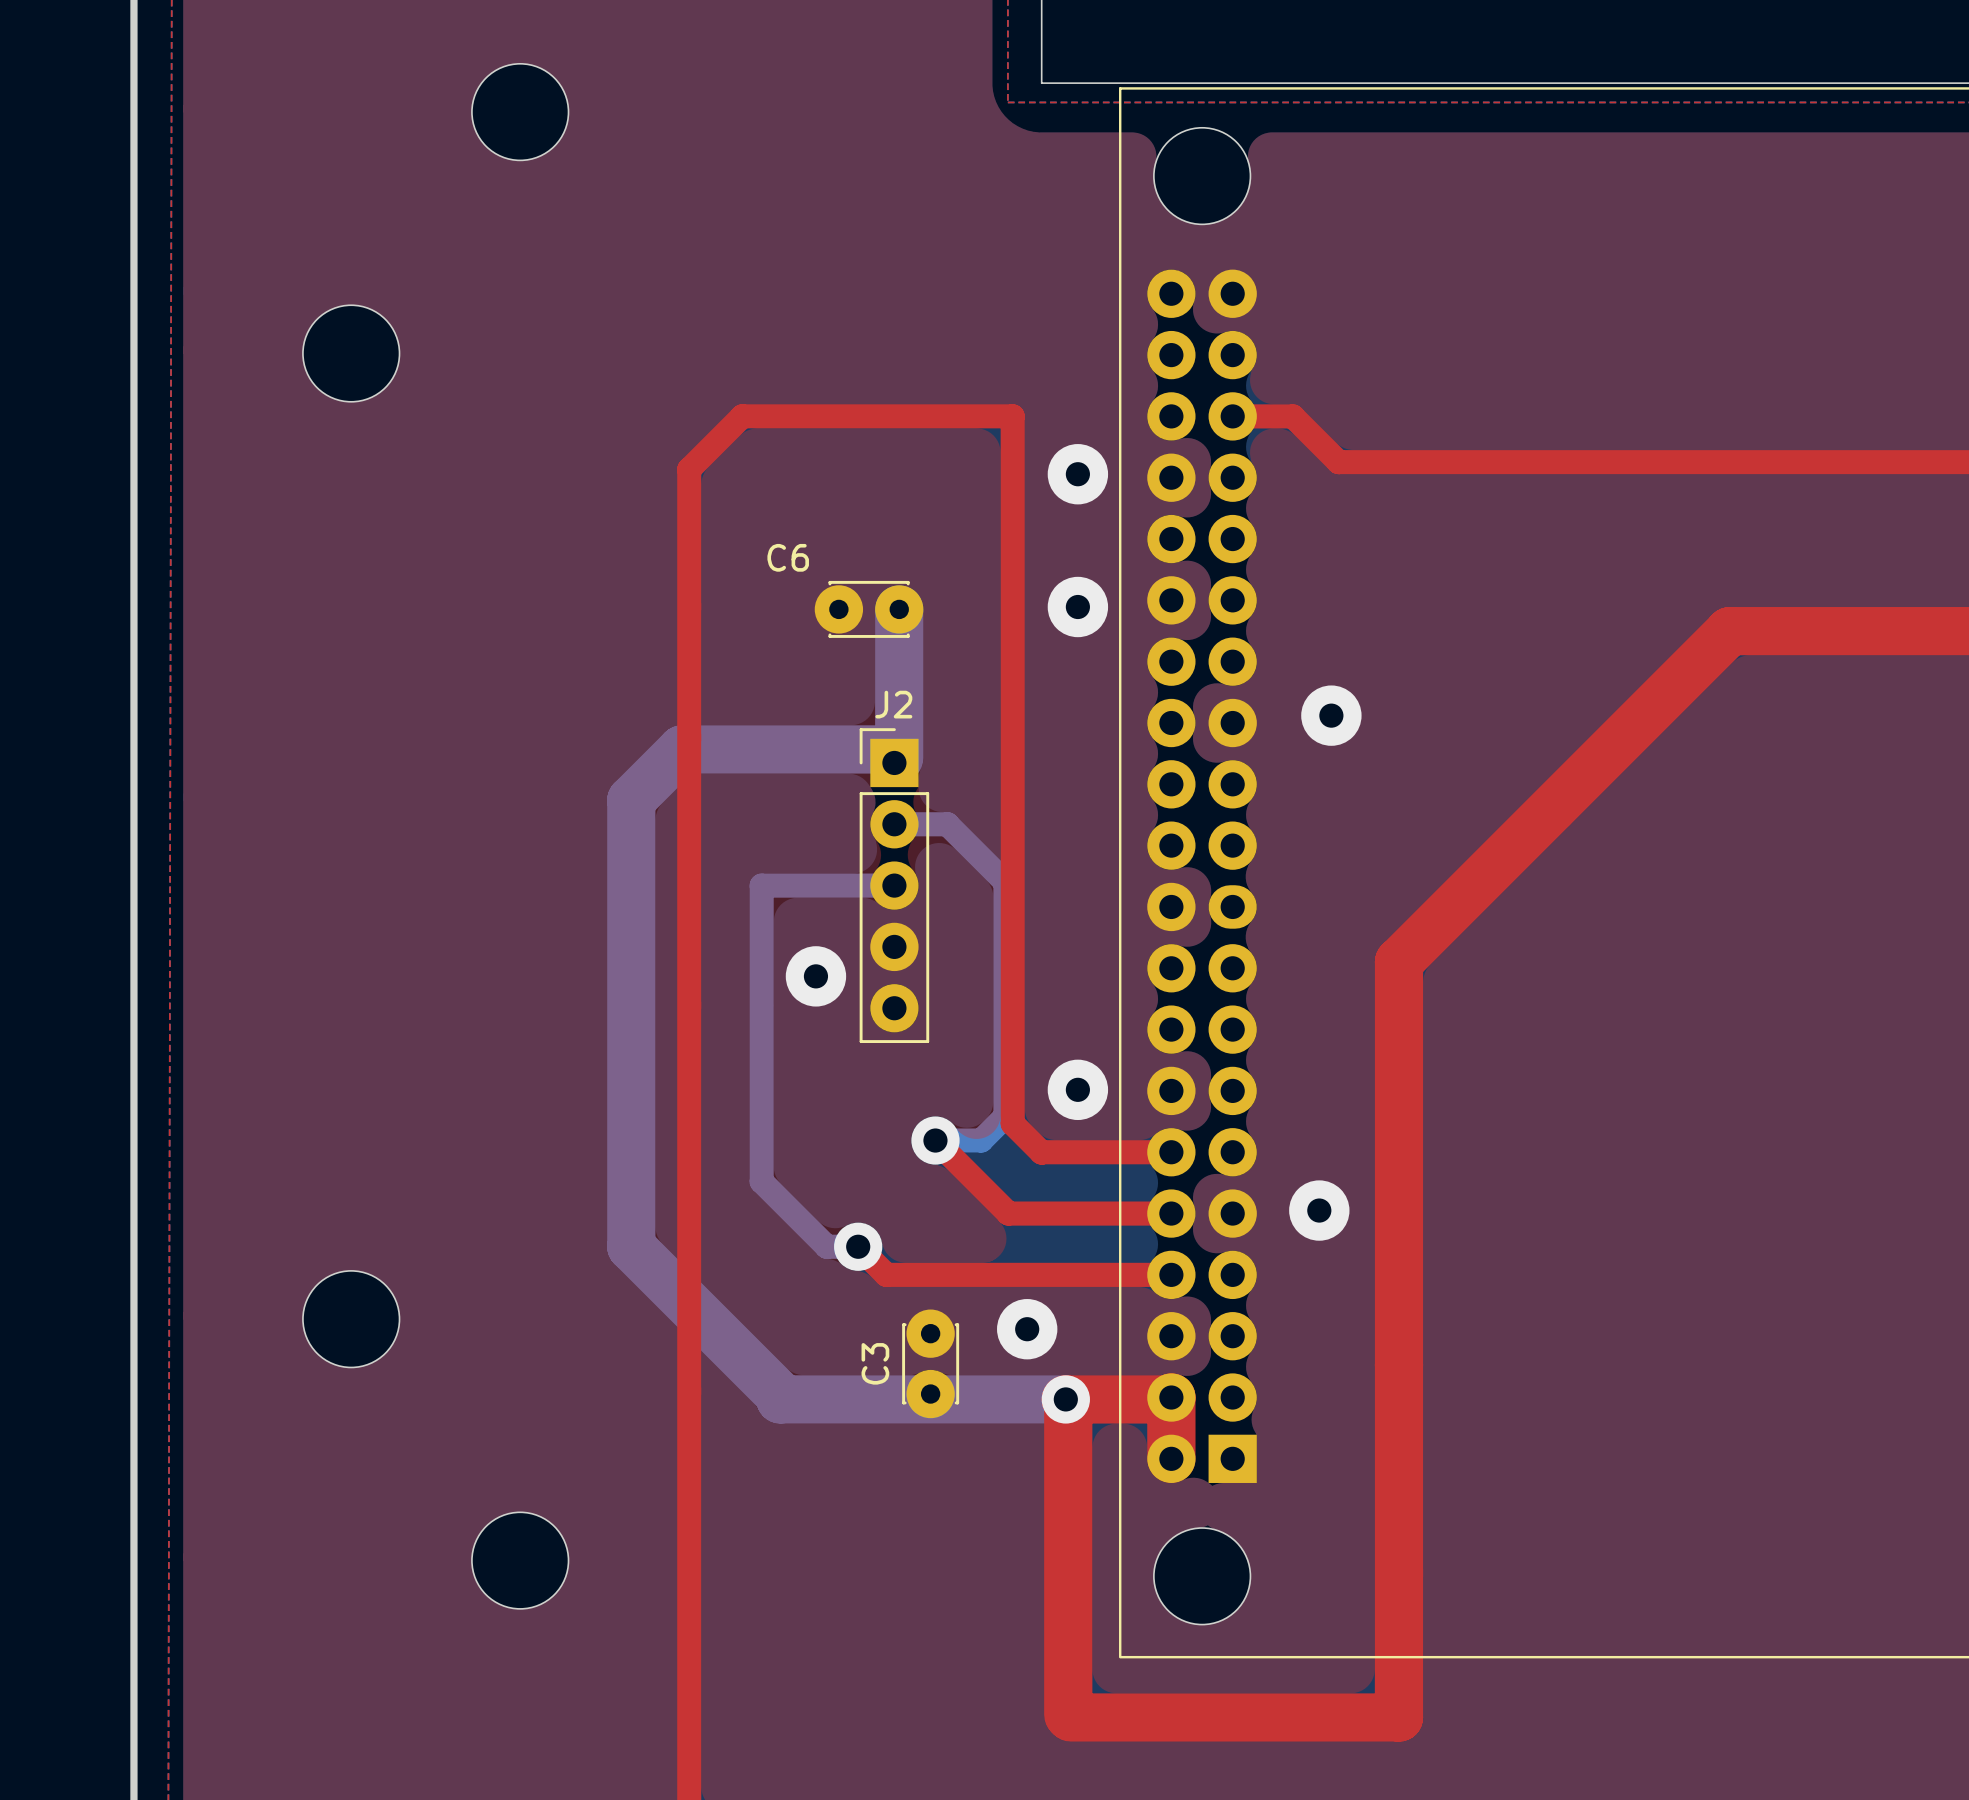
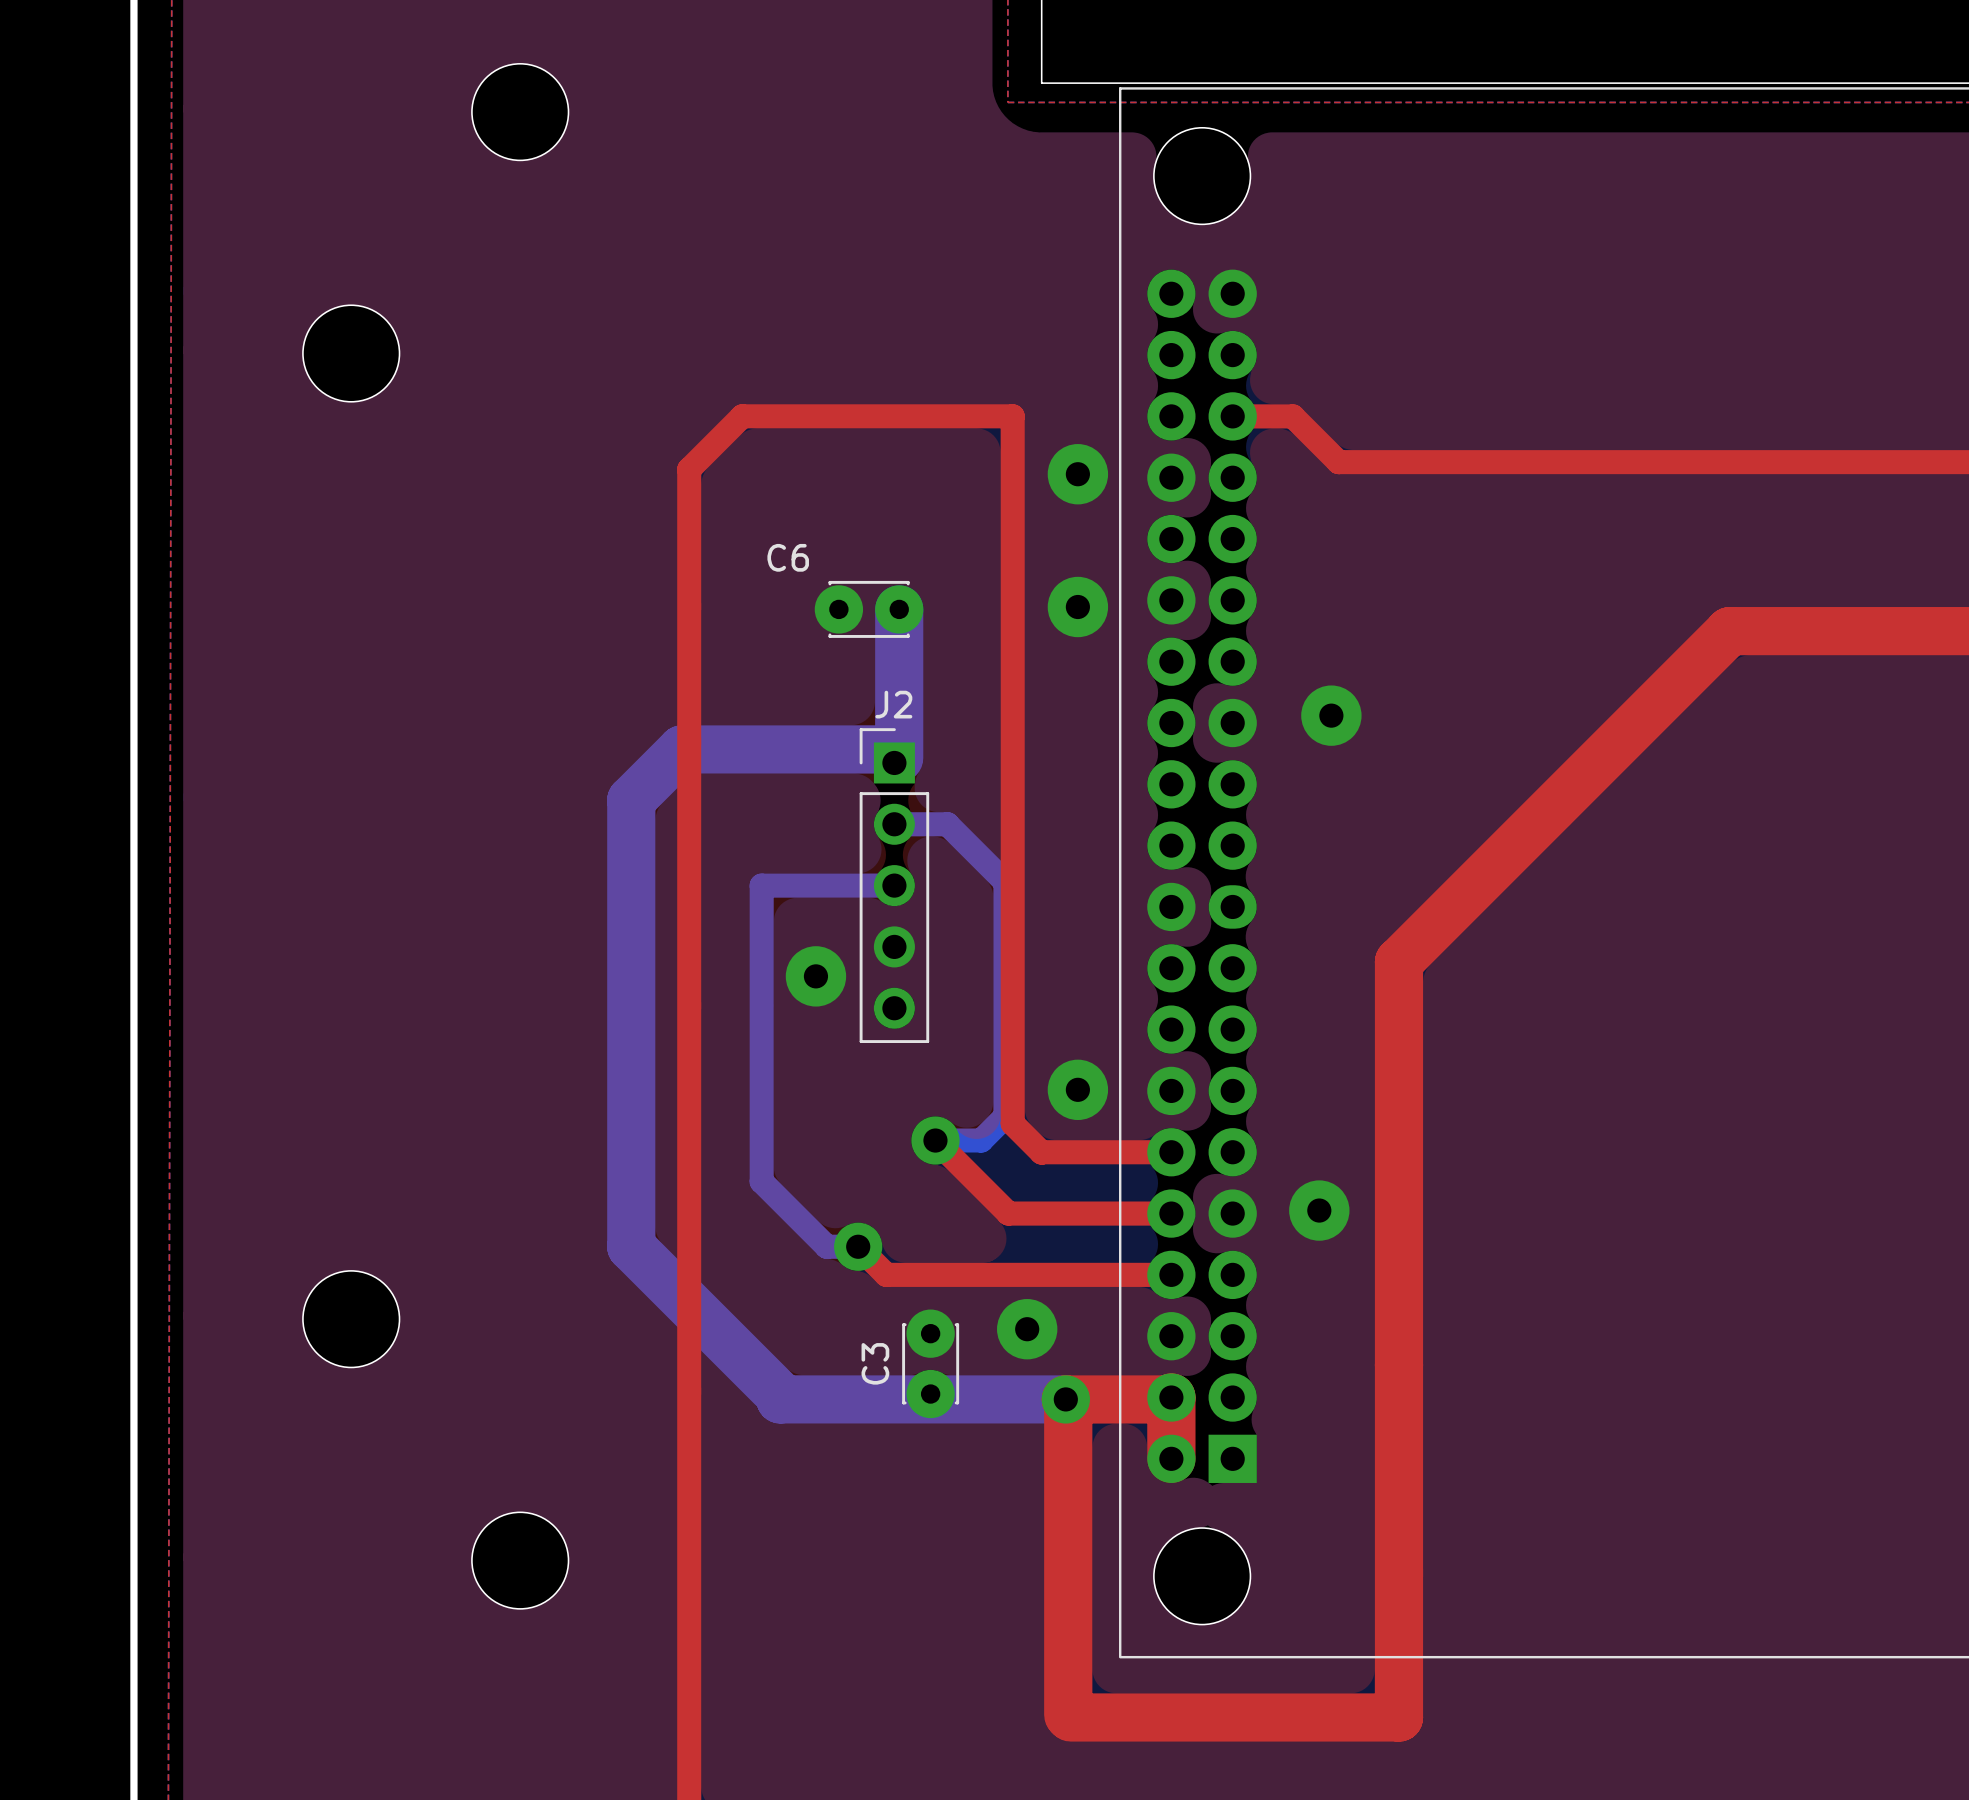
J2 footprint: [859, 728, 930, 1044] -> [859, 728, 930, 1044]

